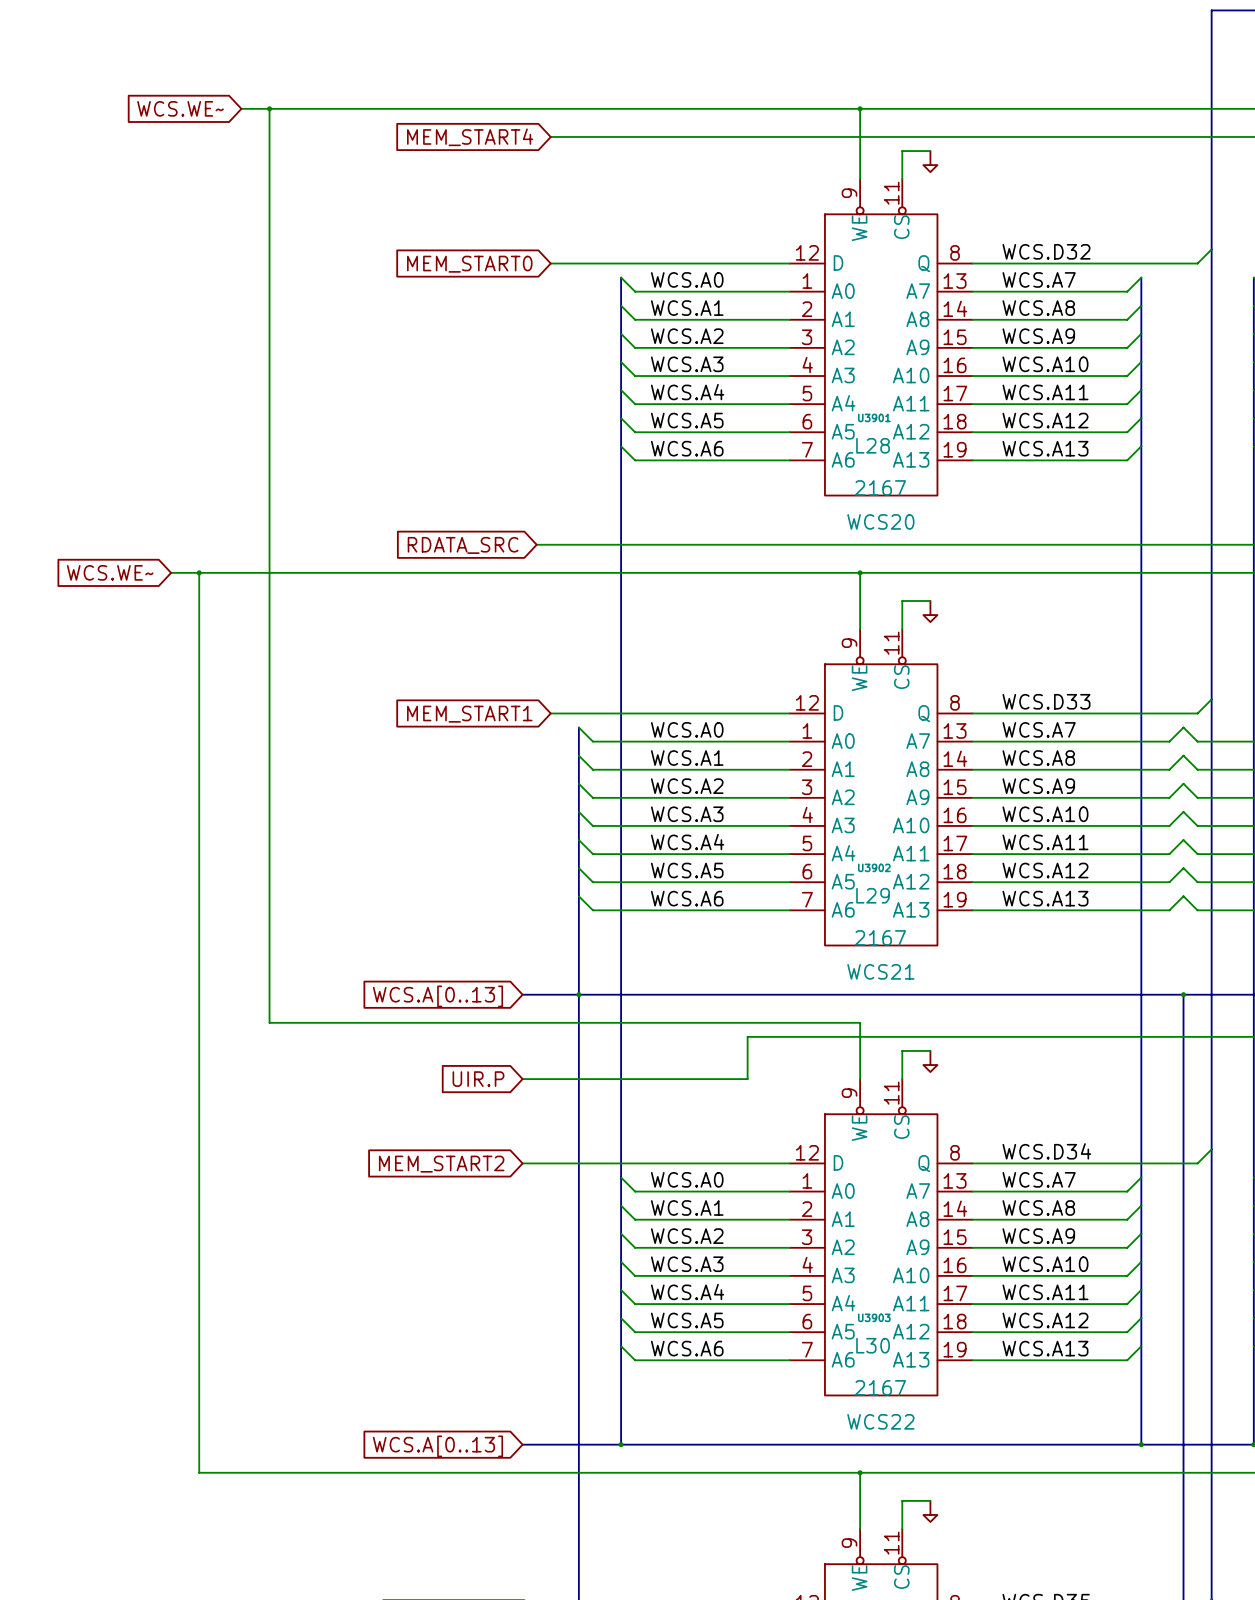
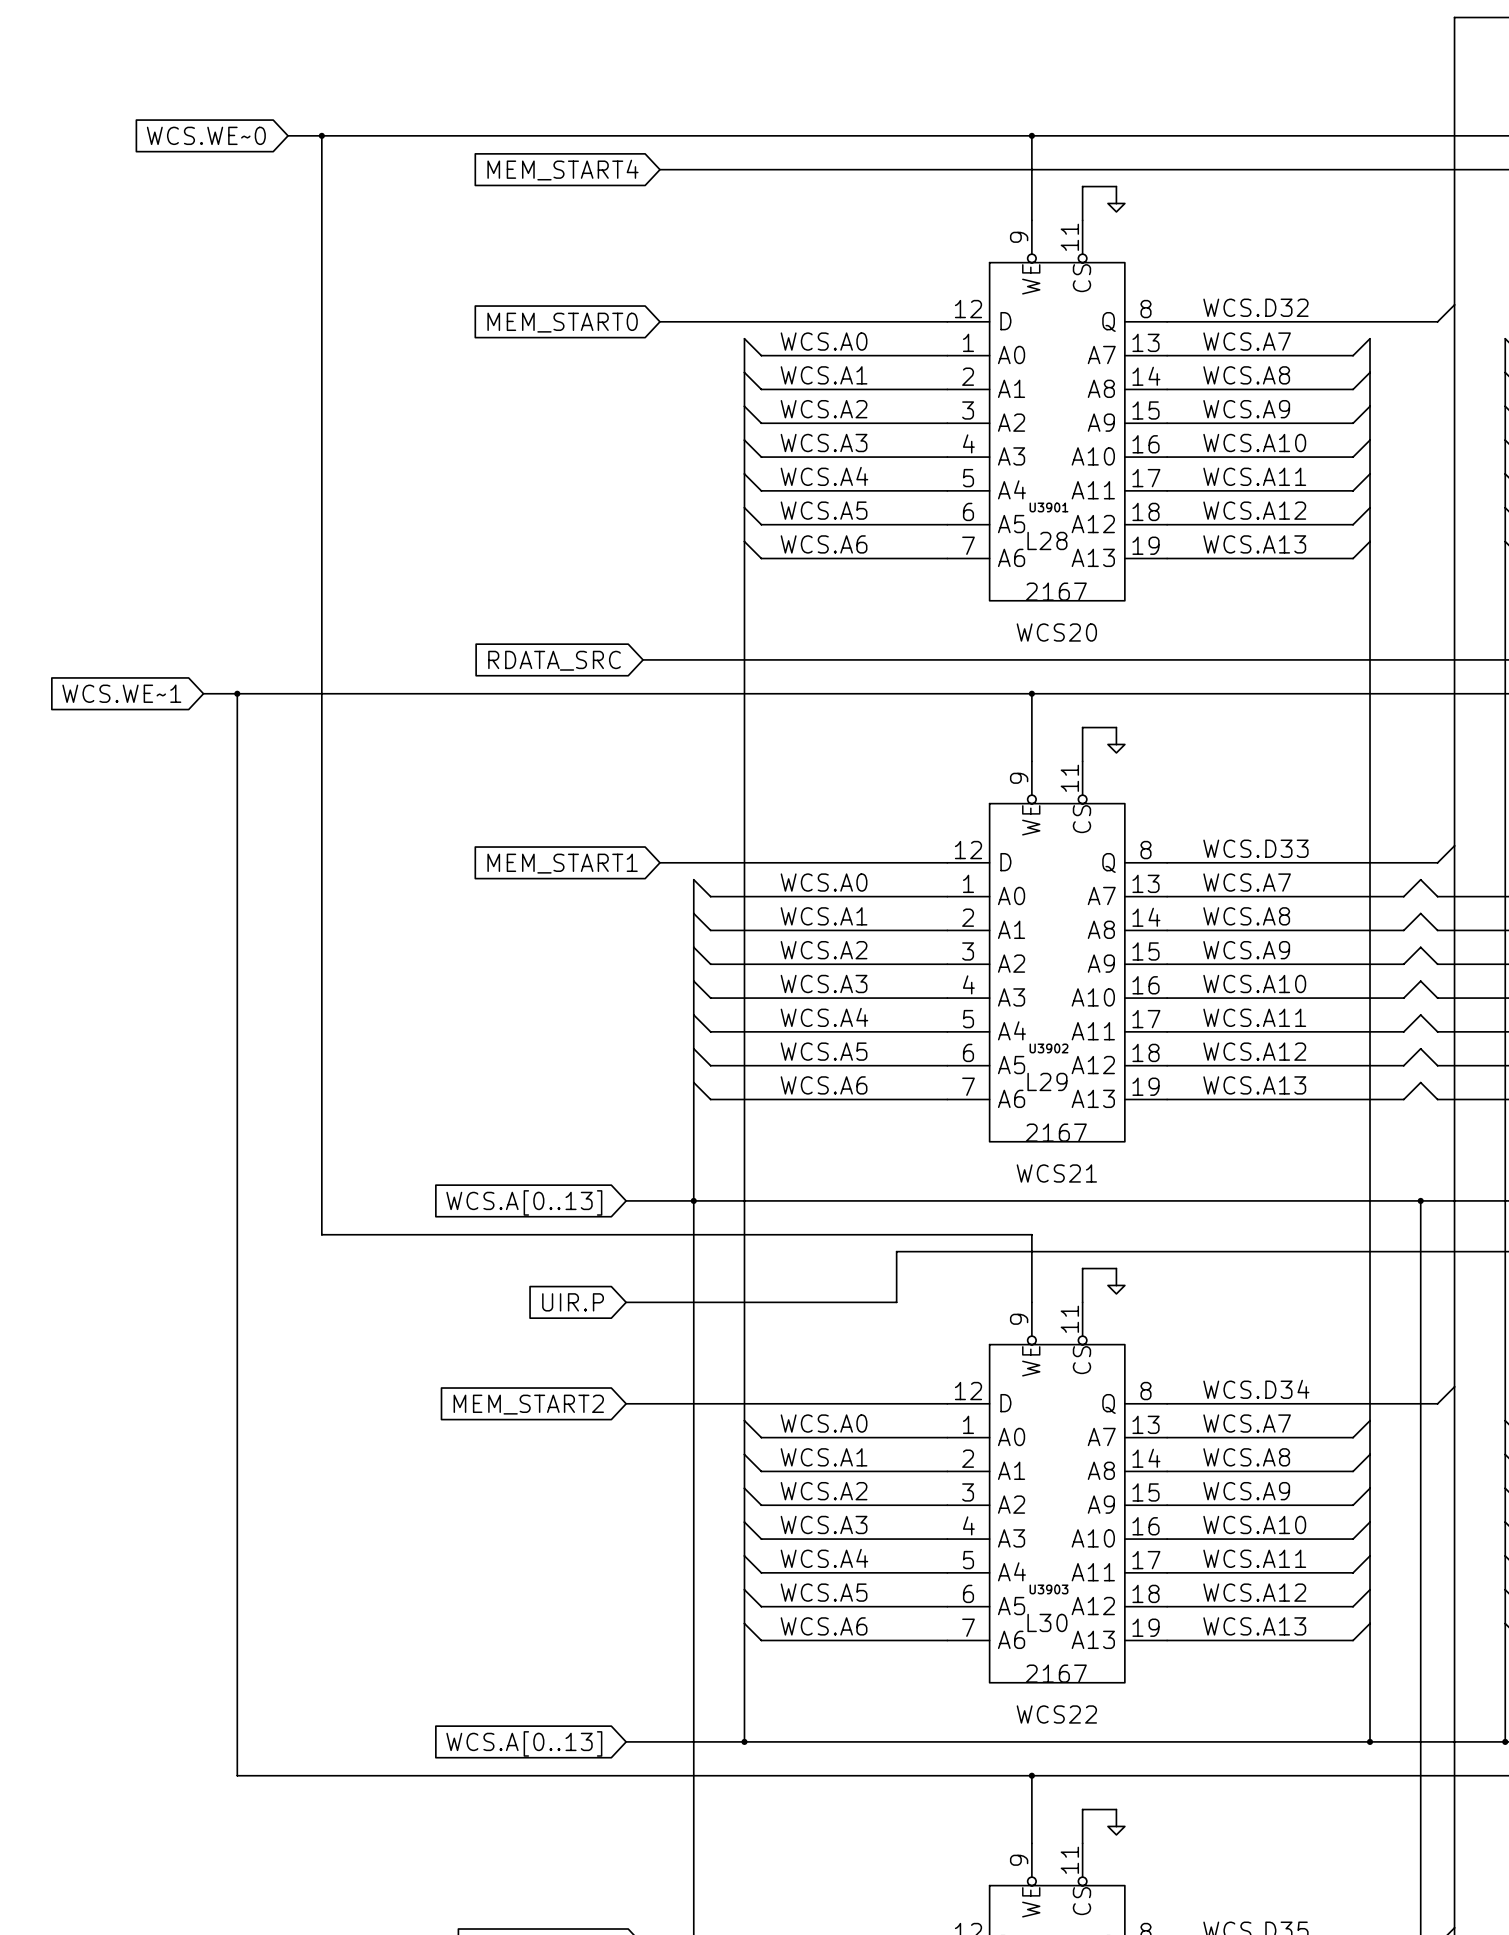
global label: WCS.WE~ (180, 108) -> WCS.WE~0 (206, 135)
global label: WCS.WE~ (110, 572) -> WCS.WE~1 (121, 693)

